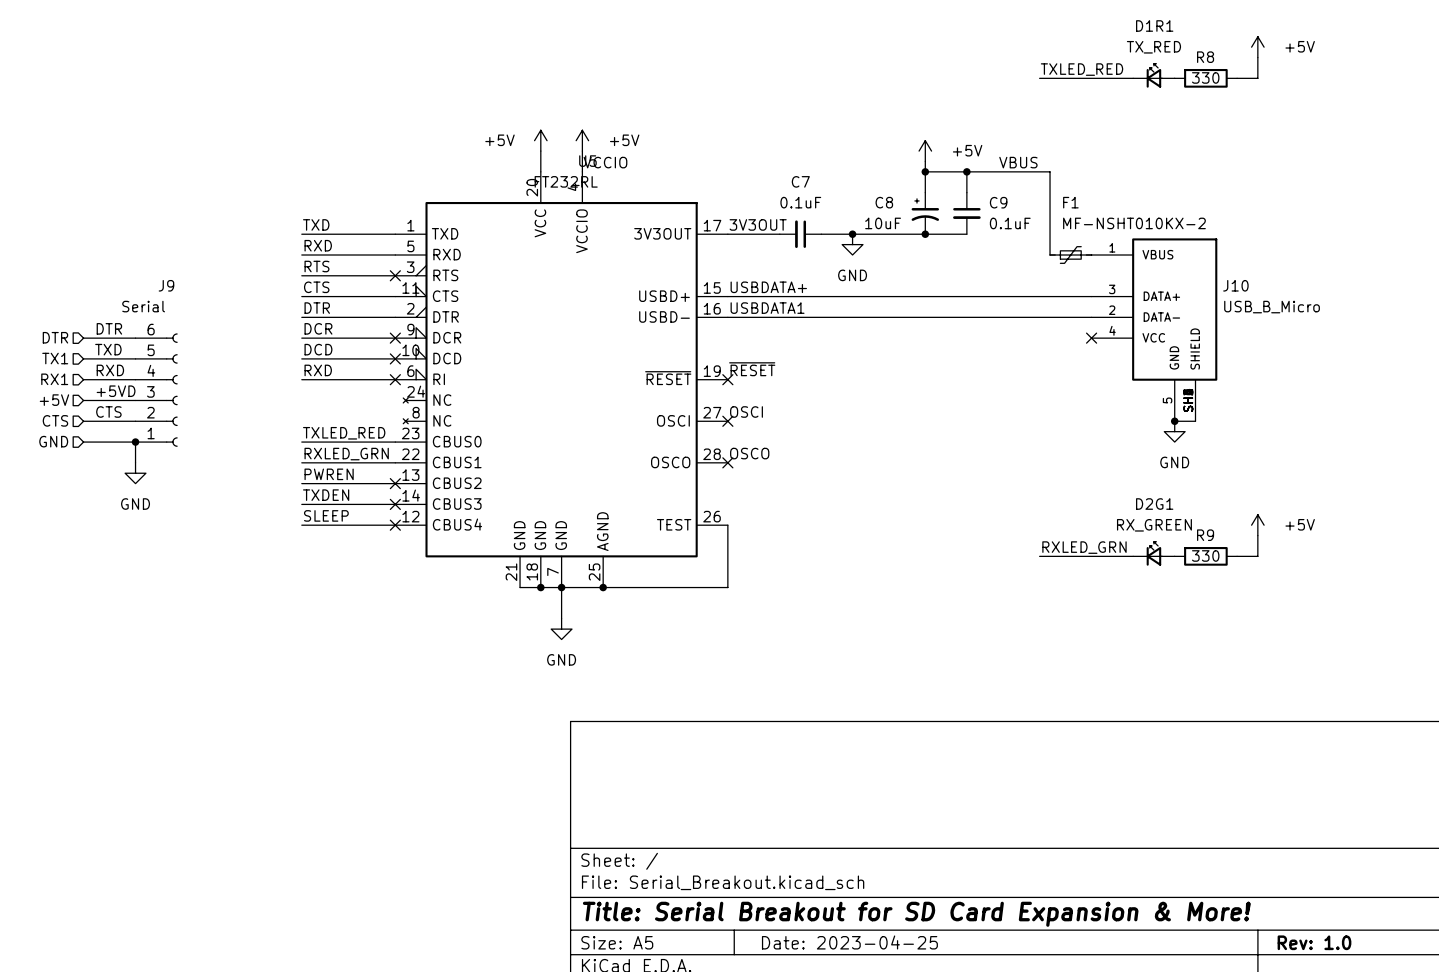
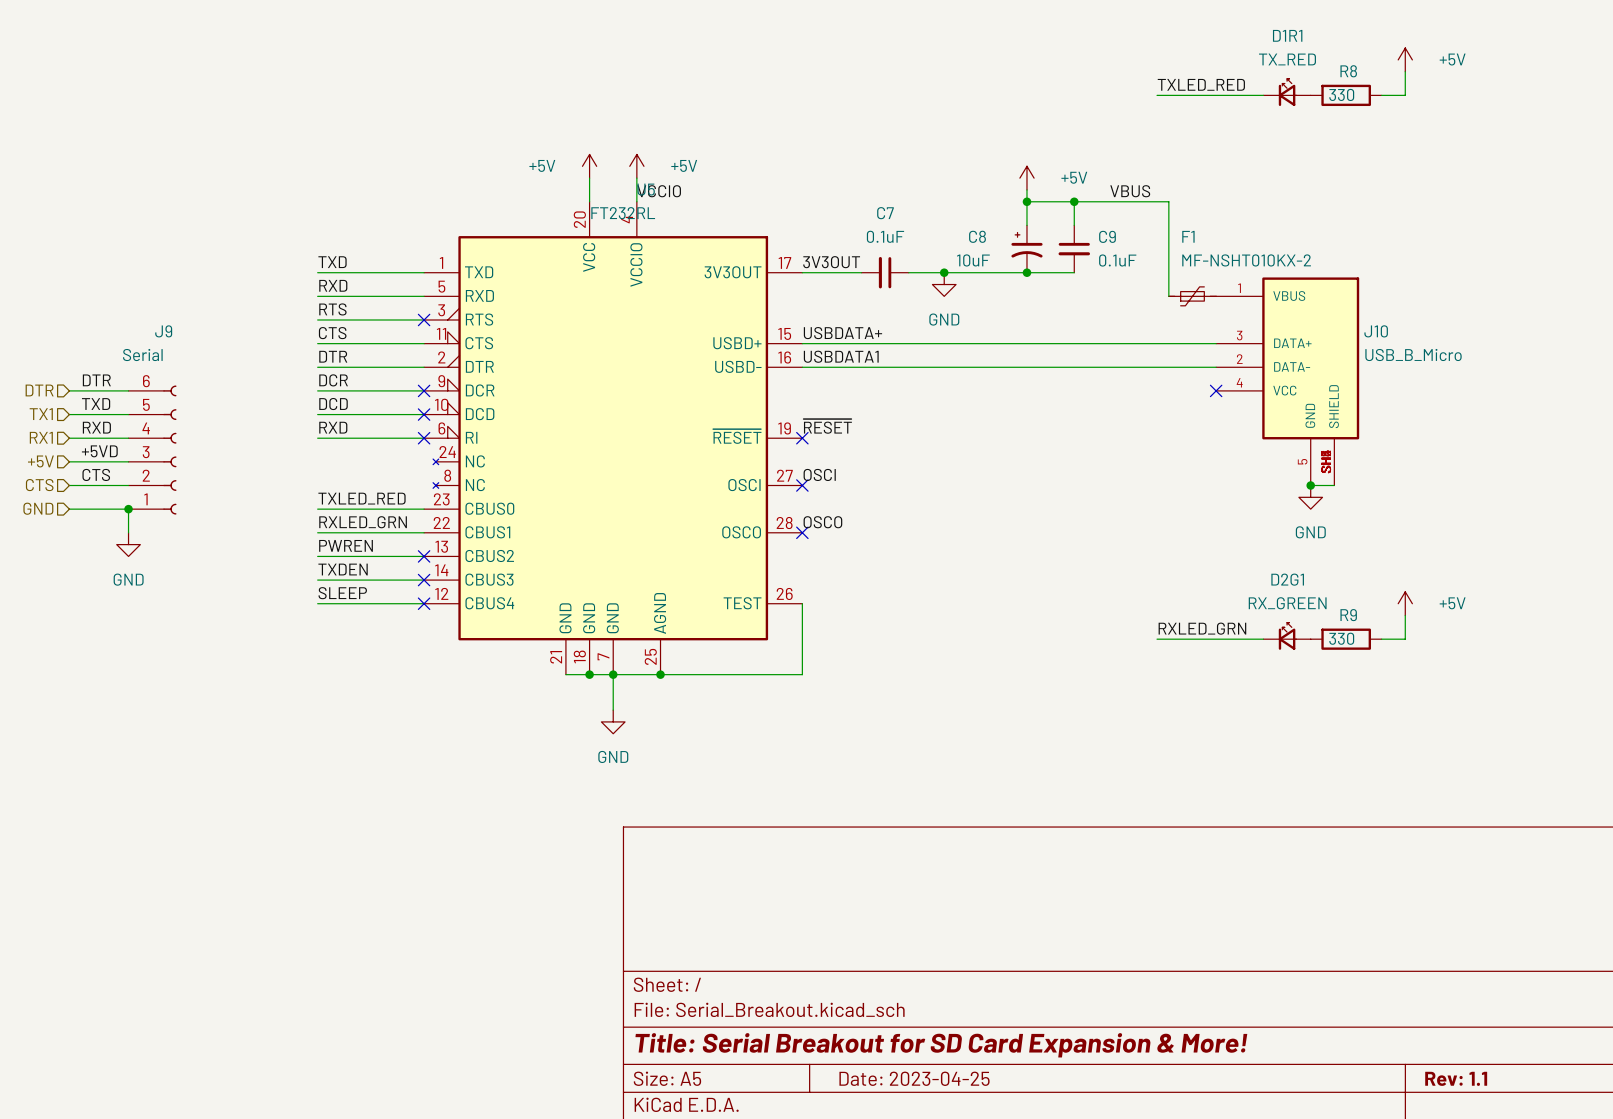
title block: Rev: 1.0 (1314, 942) -> Rev: 1.1 (1456, 1078)

